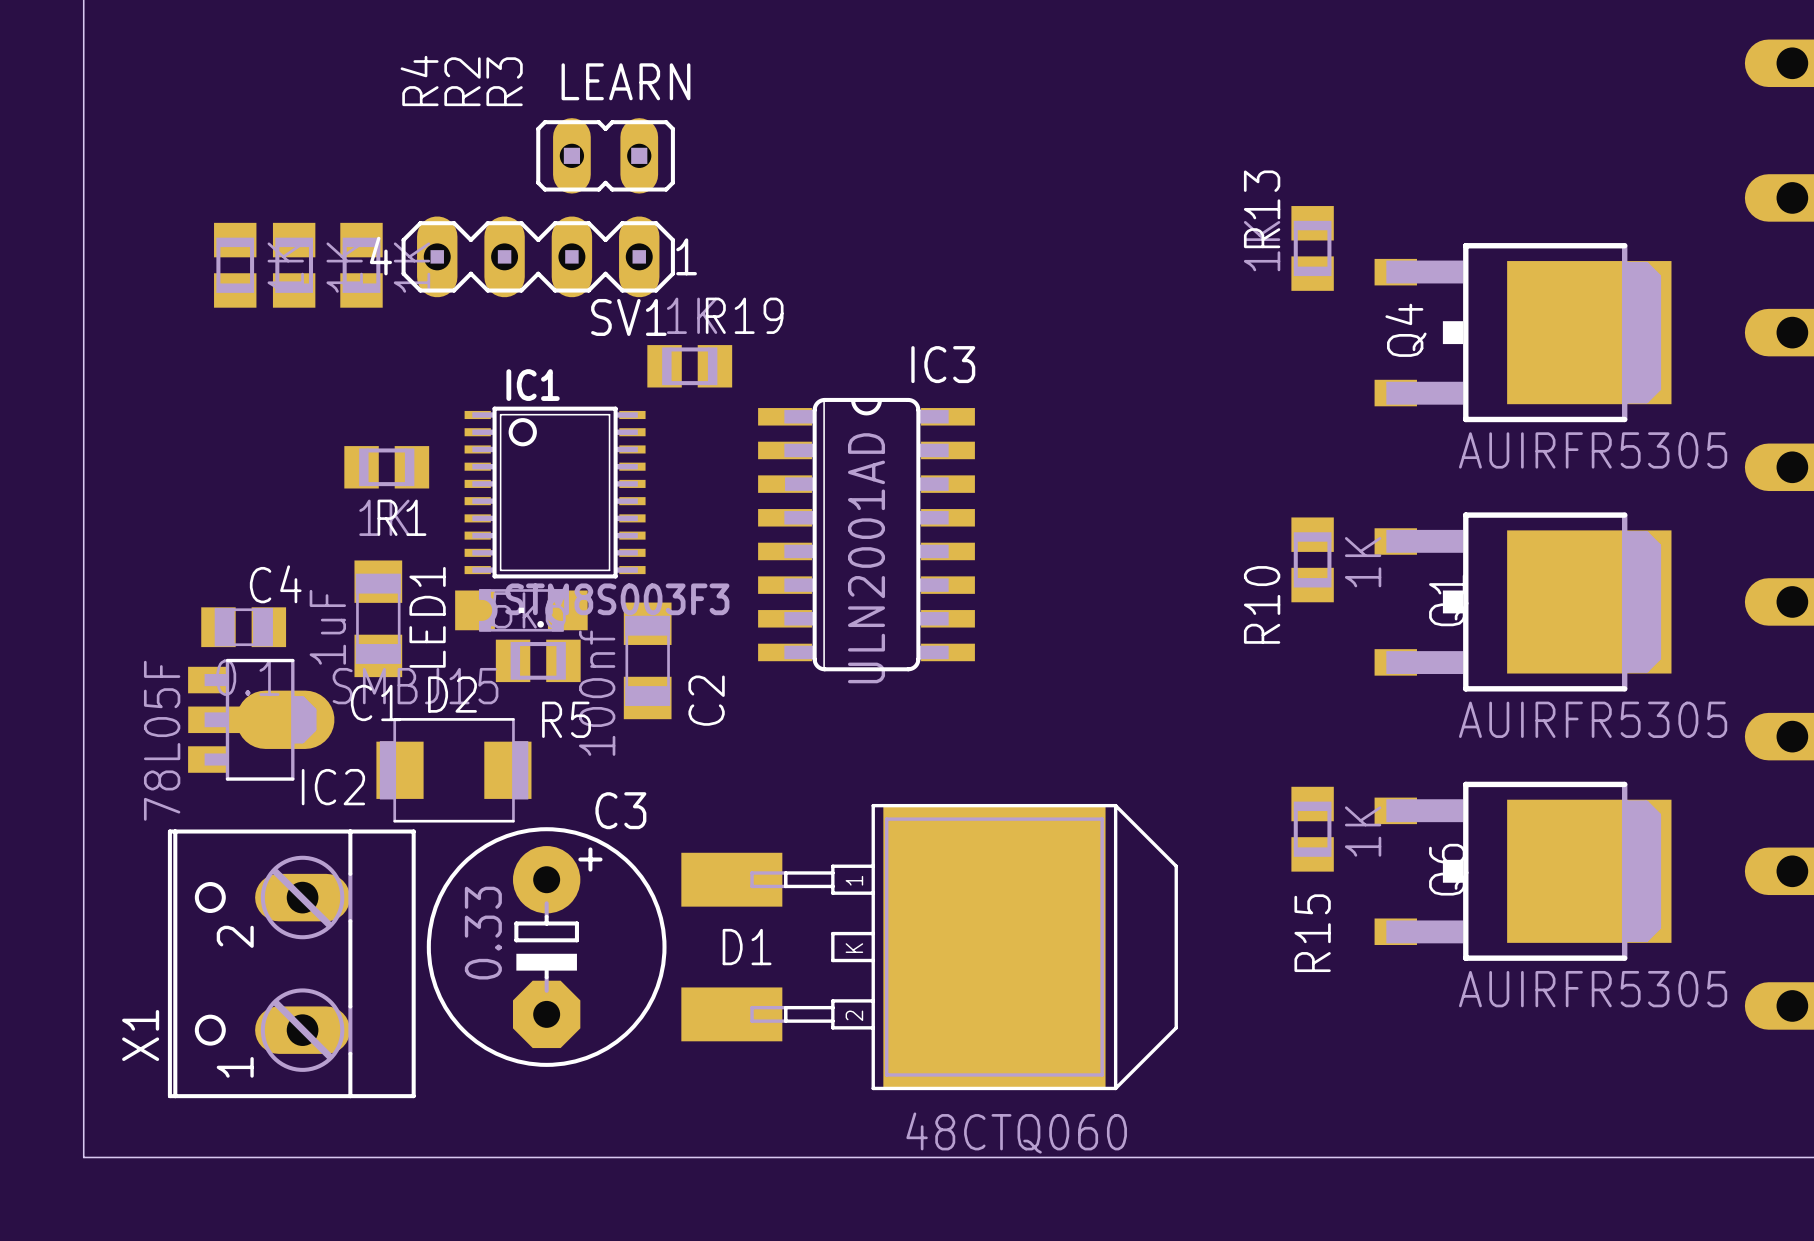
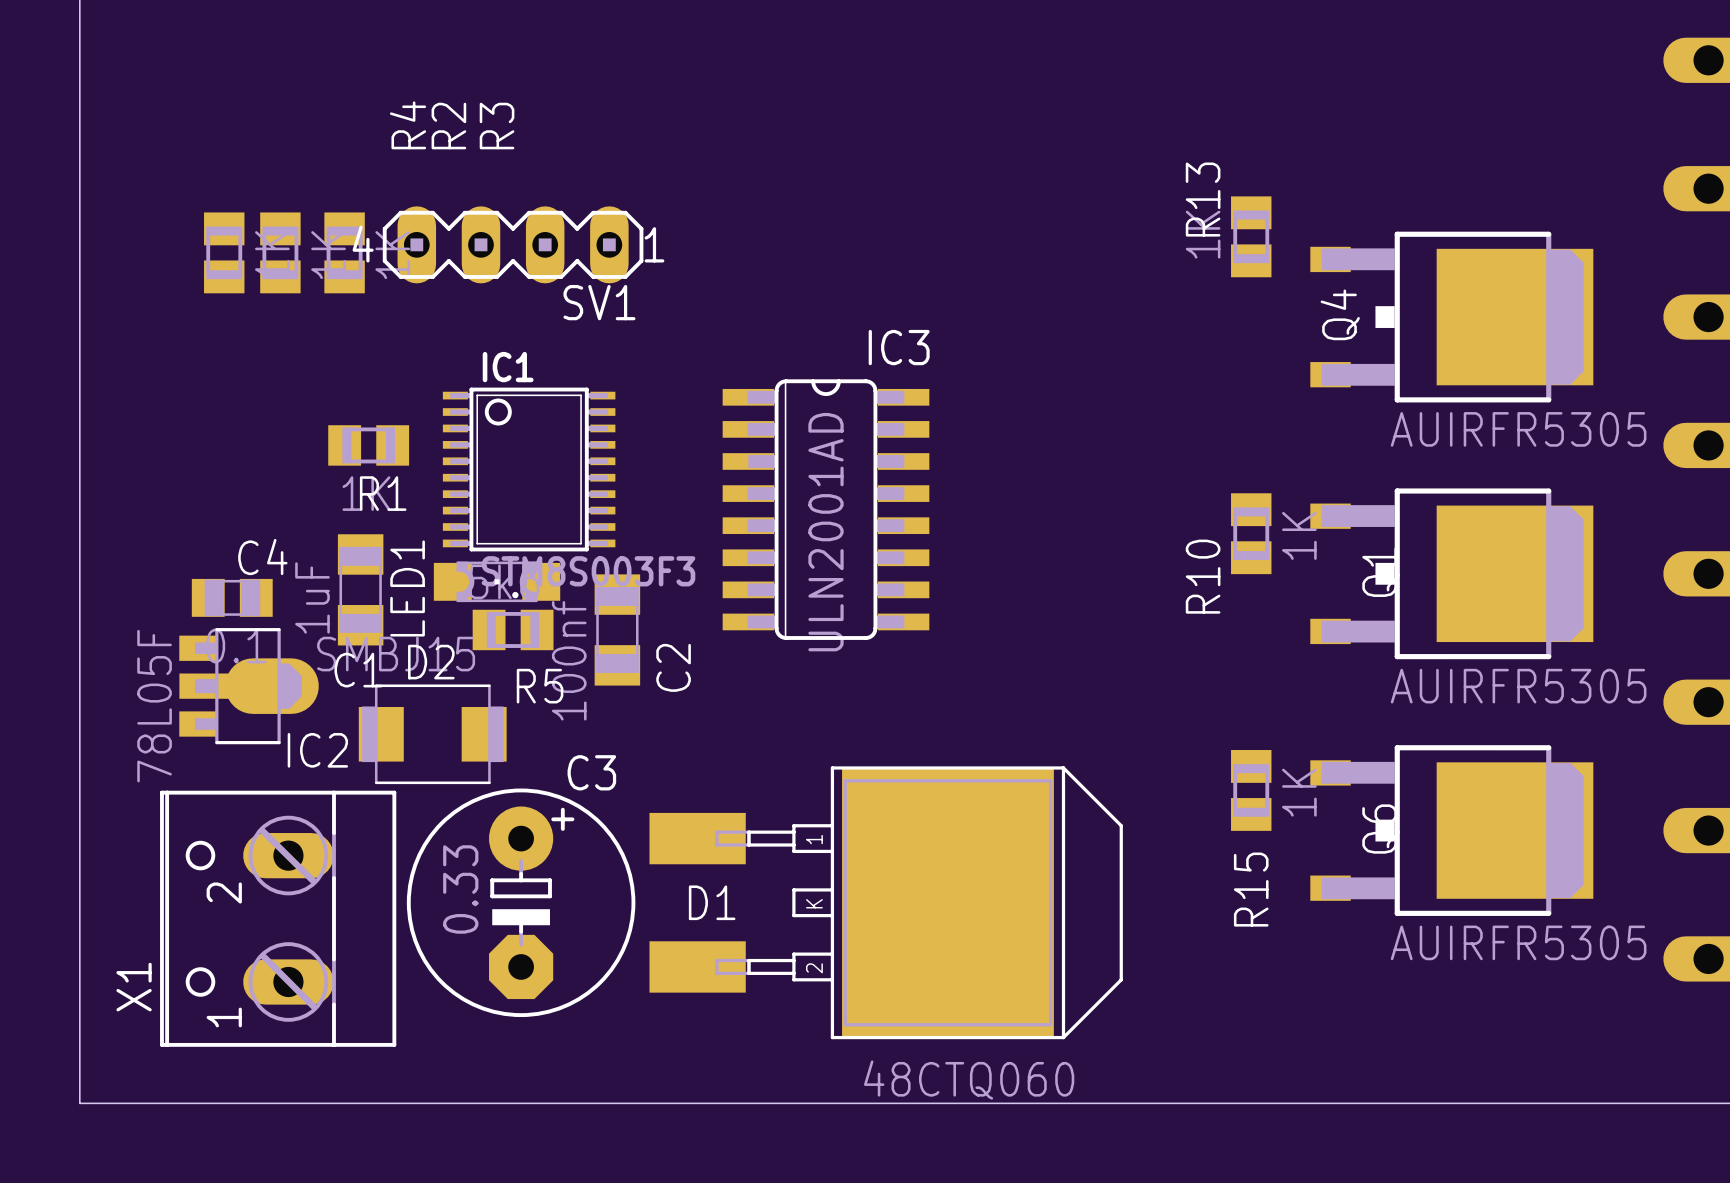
R4 name position: R4 (419, 80) -> R4 (408, 125)
R2 name position: R2 (462, 81) -> R2 (448, 126)
R3 name position: R3 (504, 81) -> R3 (497, 126)
LEARN: (605, 155) -> none
R19: 1K (689, 366) -> none

